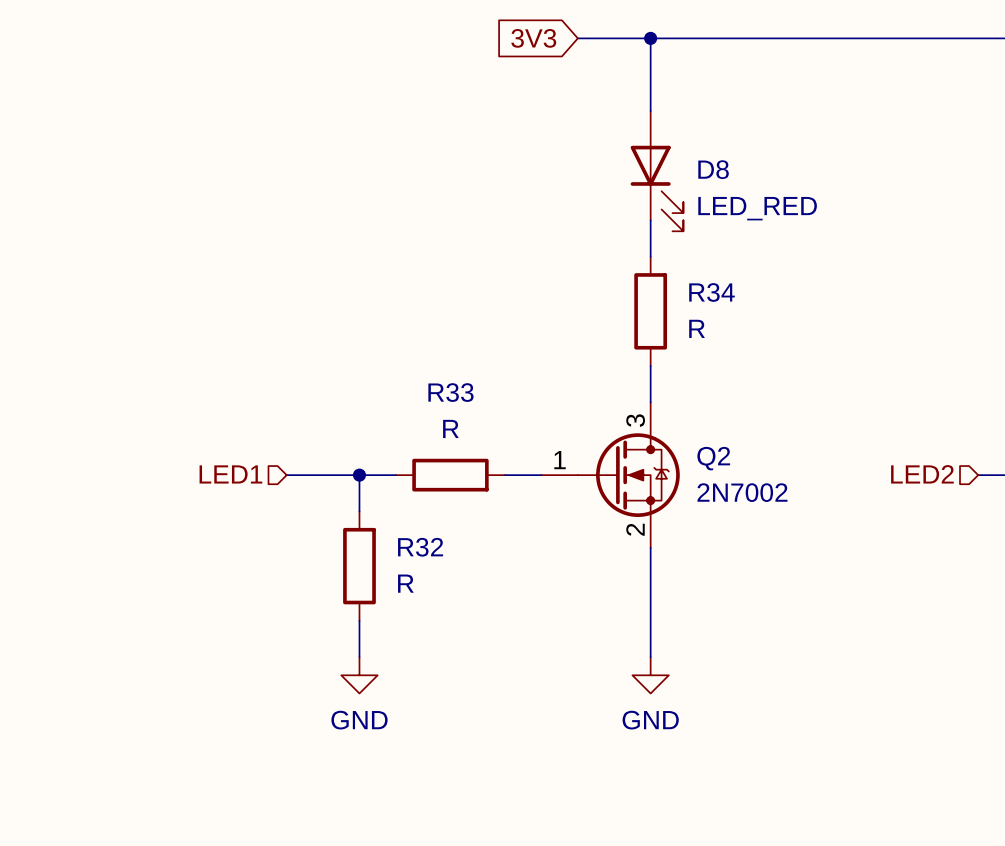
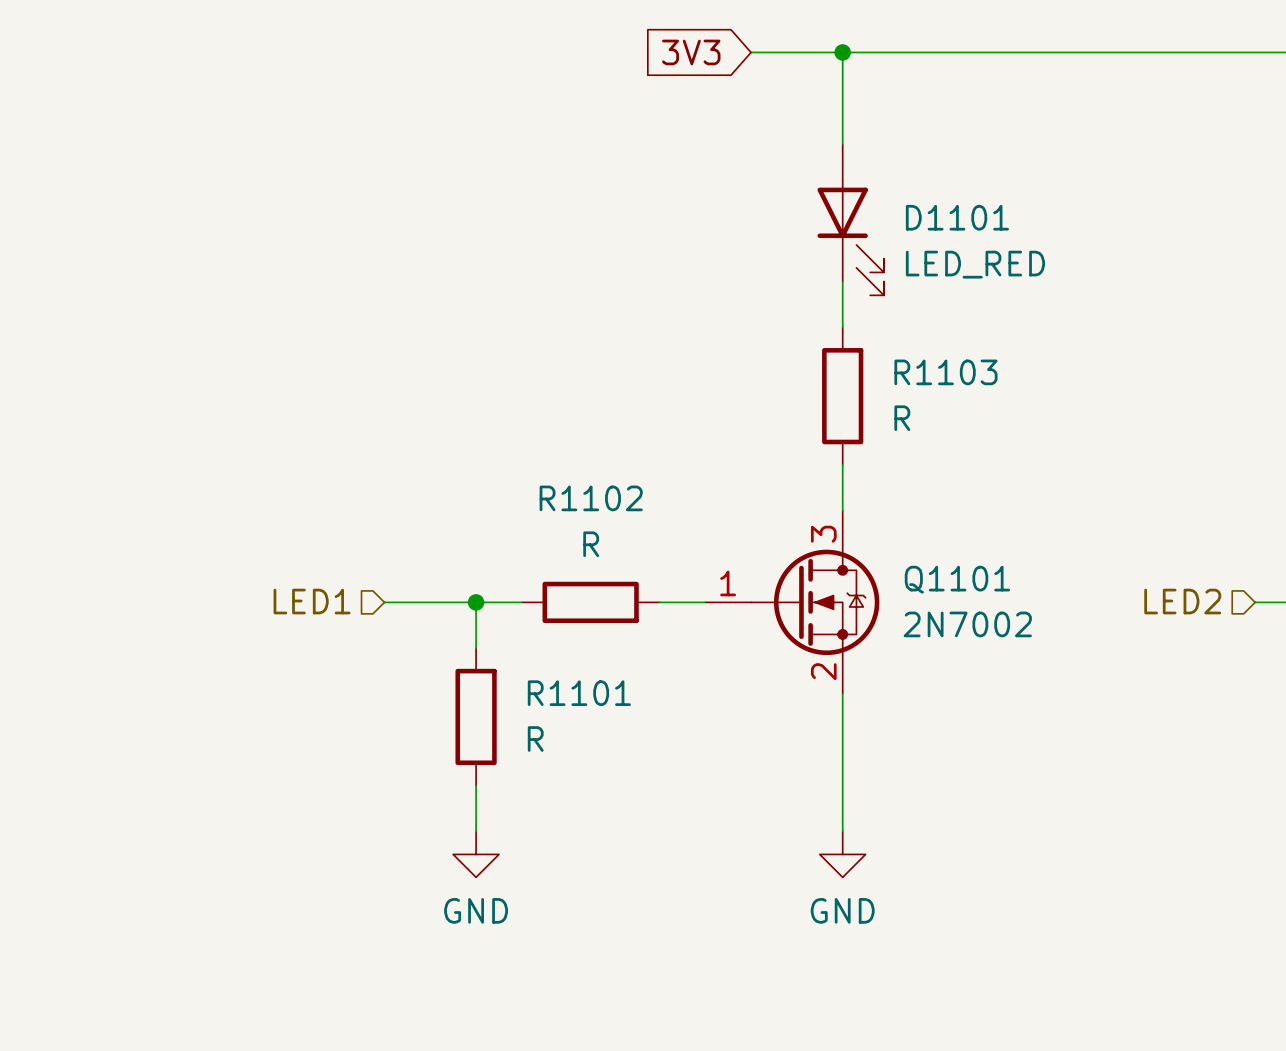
D8 name: D8 (713, 169) -> D1101 (957, 217)
R34 name: R34 (712, 292) -> R1103 (945, 372)
R33 name: R33 (450, 392) -> R1102 (591, 498)
Q2 name: Q2 (713, 458) -> Q1101 (957, 579)
R32 name: R32 (420, 547) -> R1101 (579, 693)

